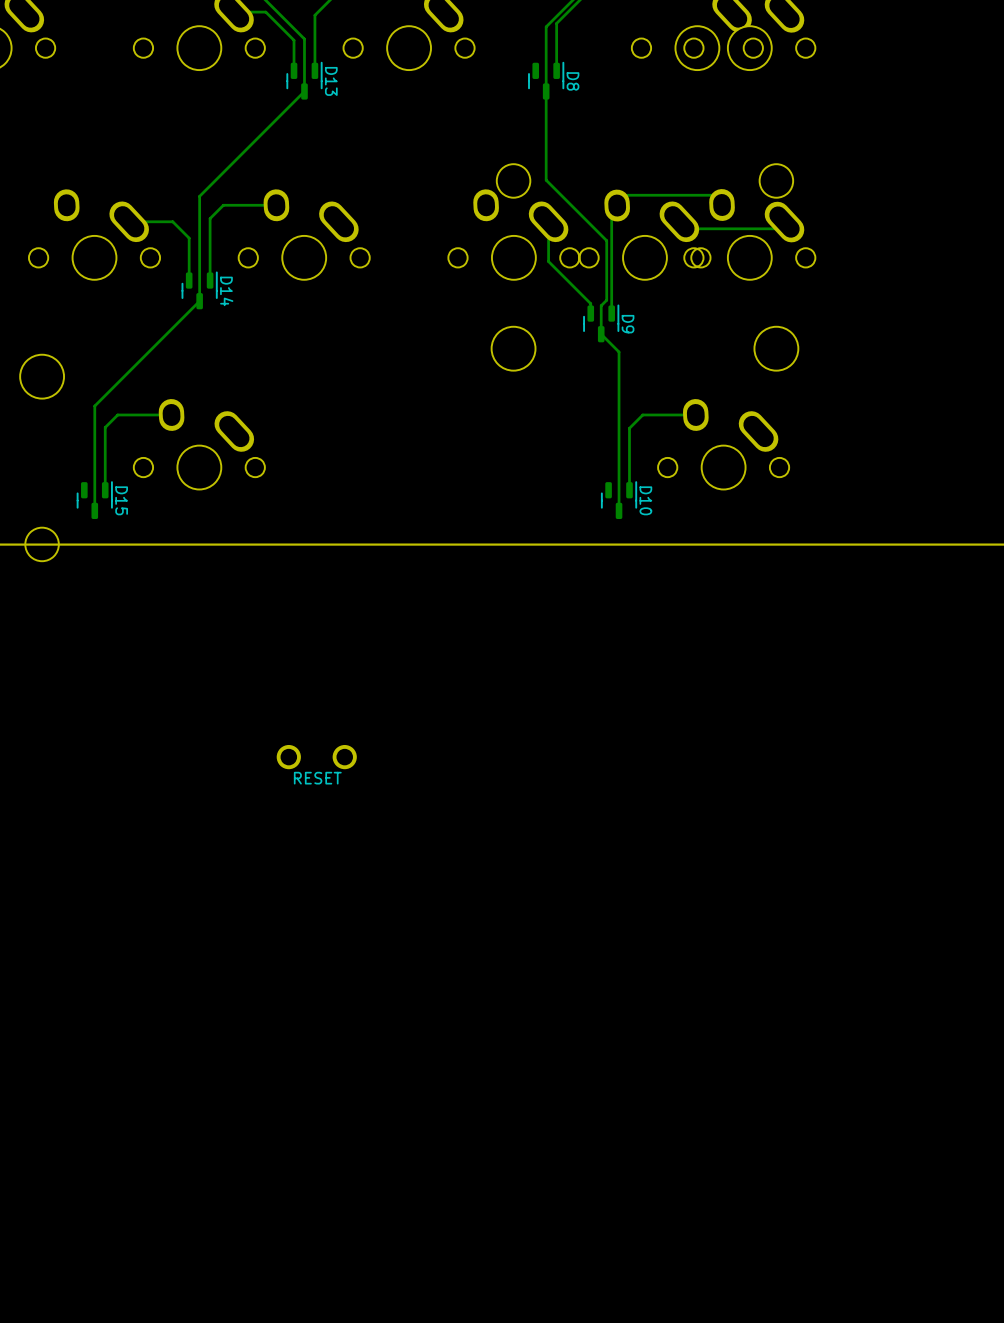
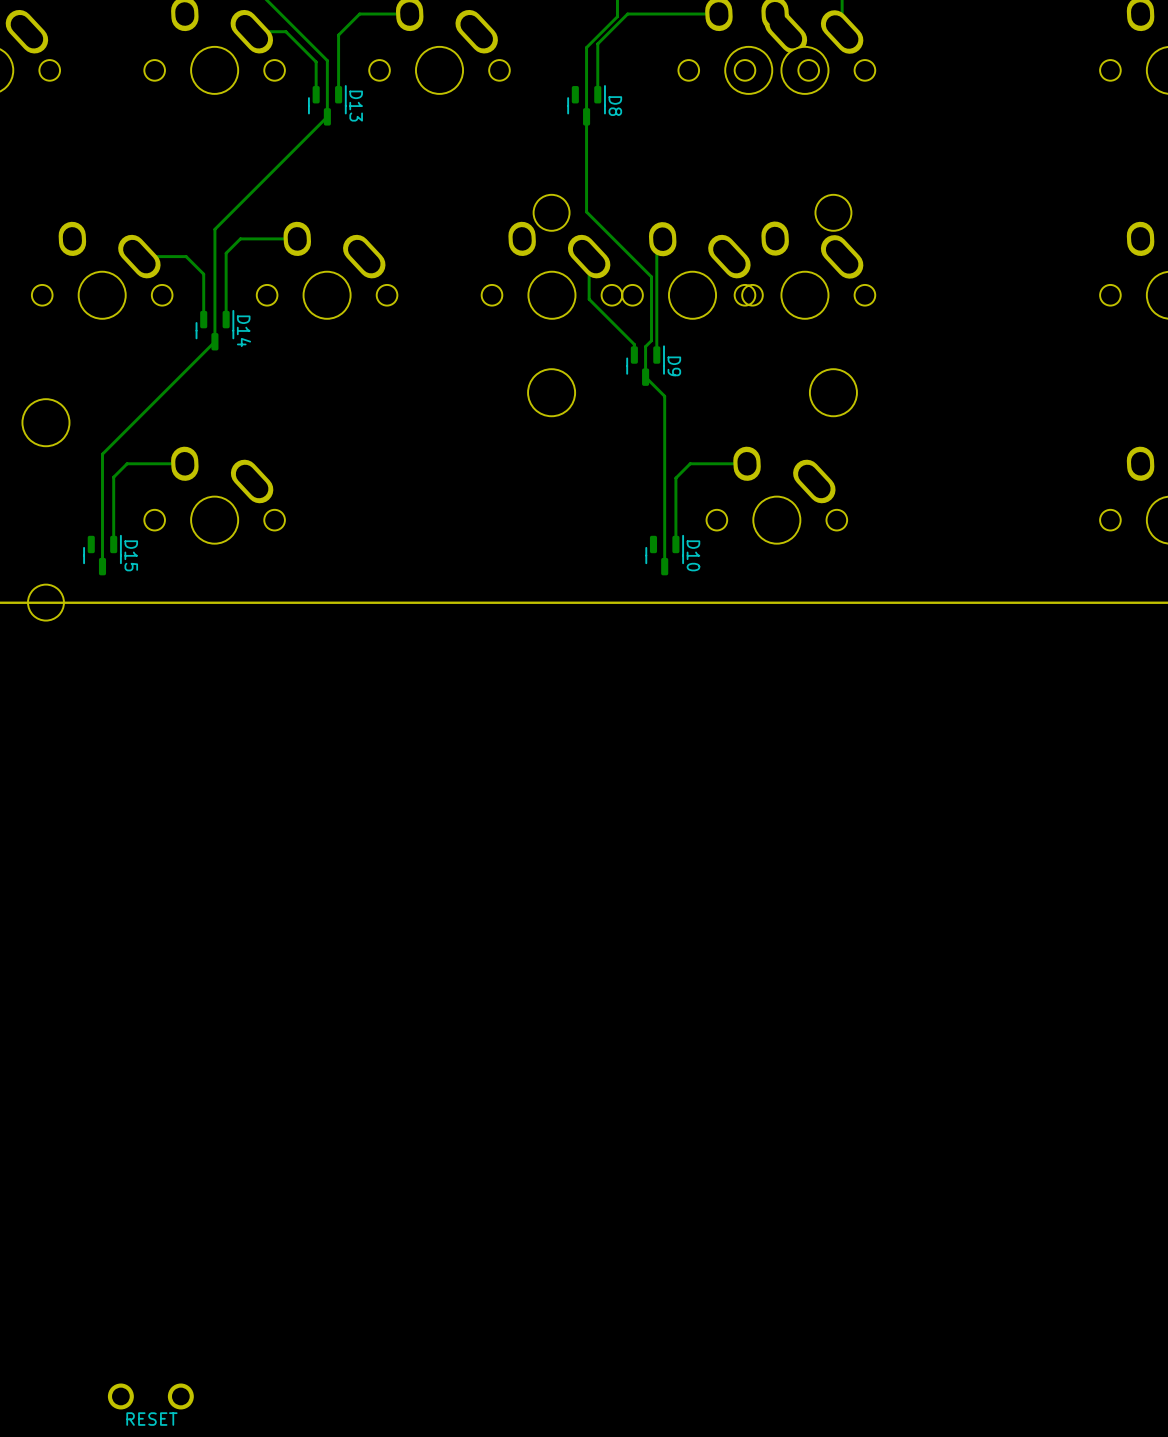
track: (722, 205) (712, 195) (627, 195) (617, 205) -> none
track: (679, 221) (686, 228) (777, 228) (784, 222) -> none
part: (316, 757) -> none
part: none -> (150, 1396)

